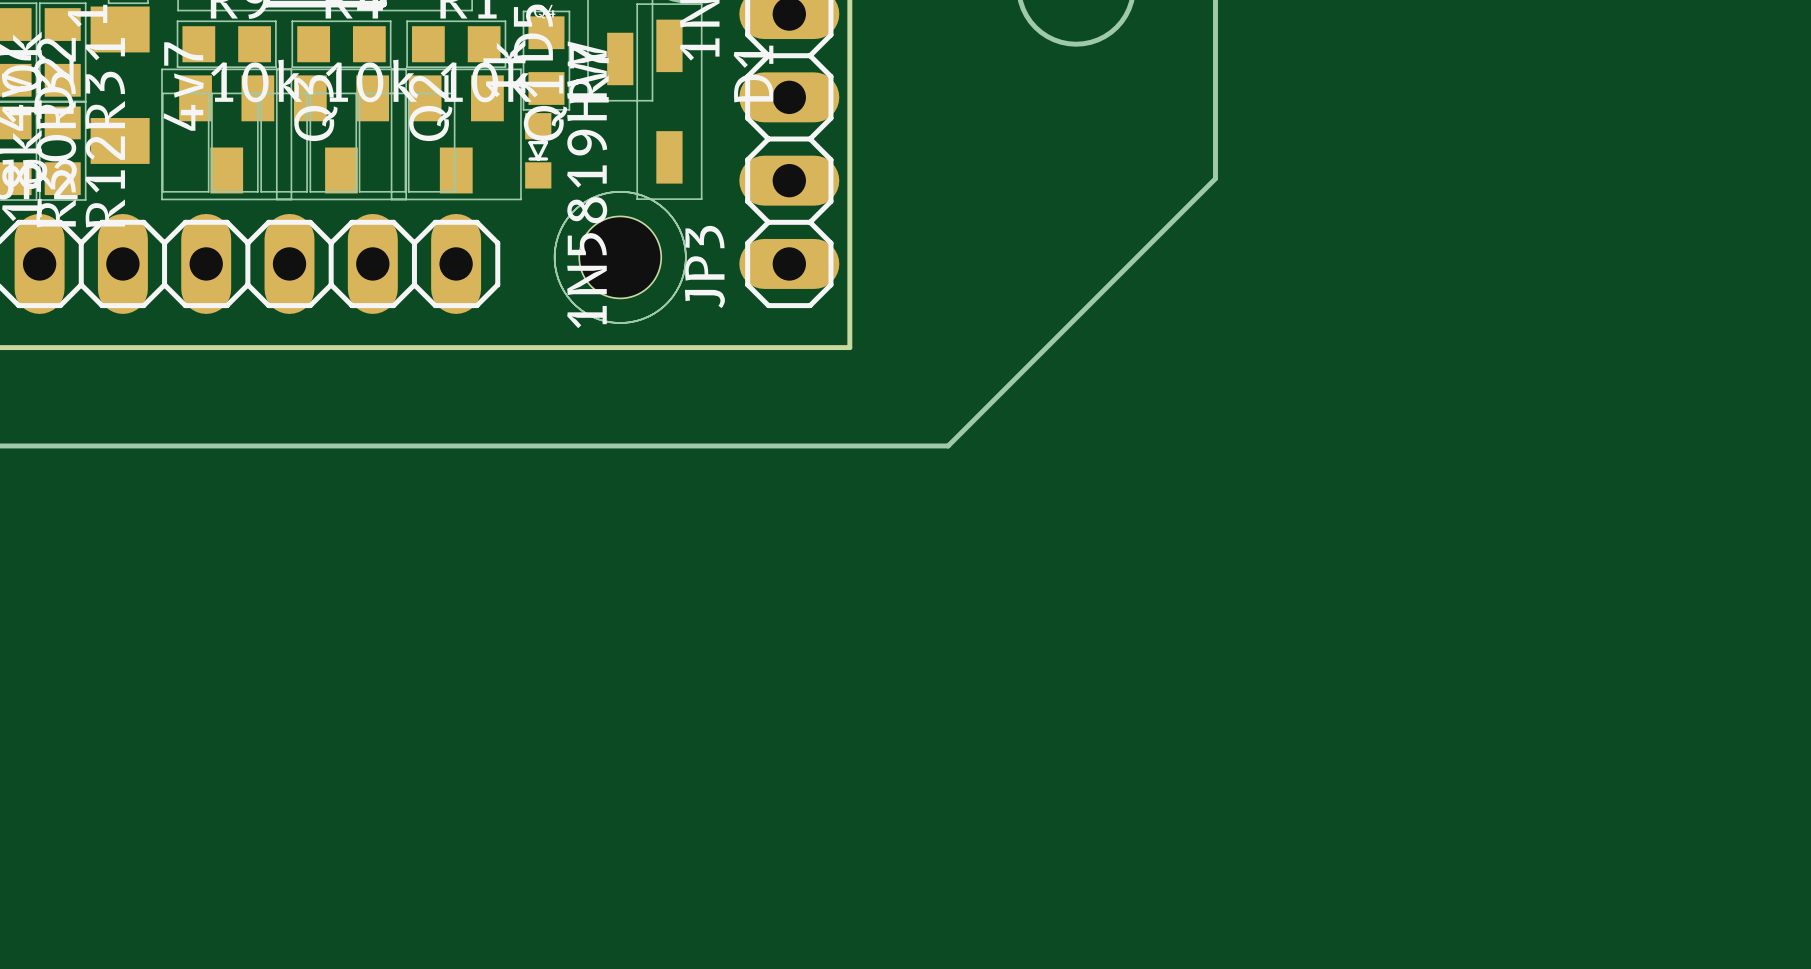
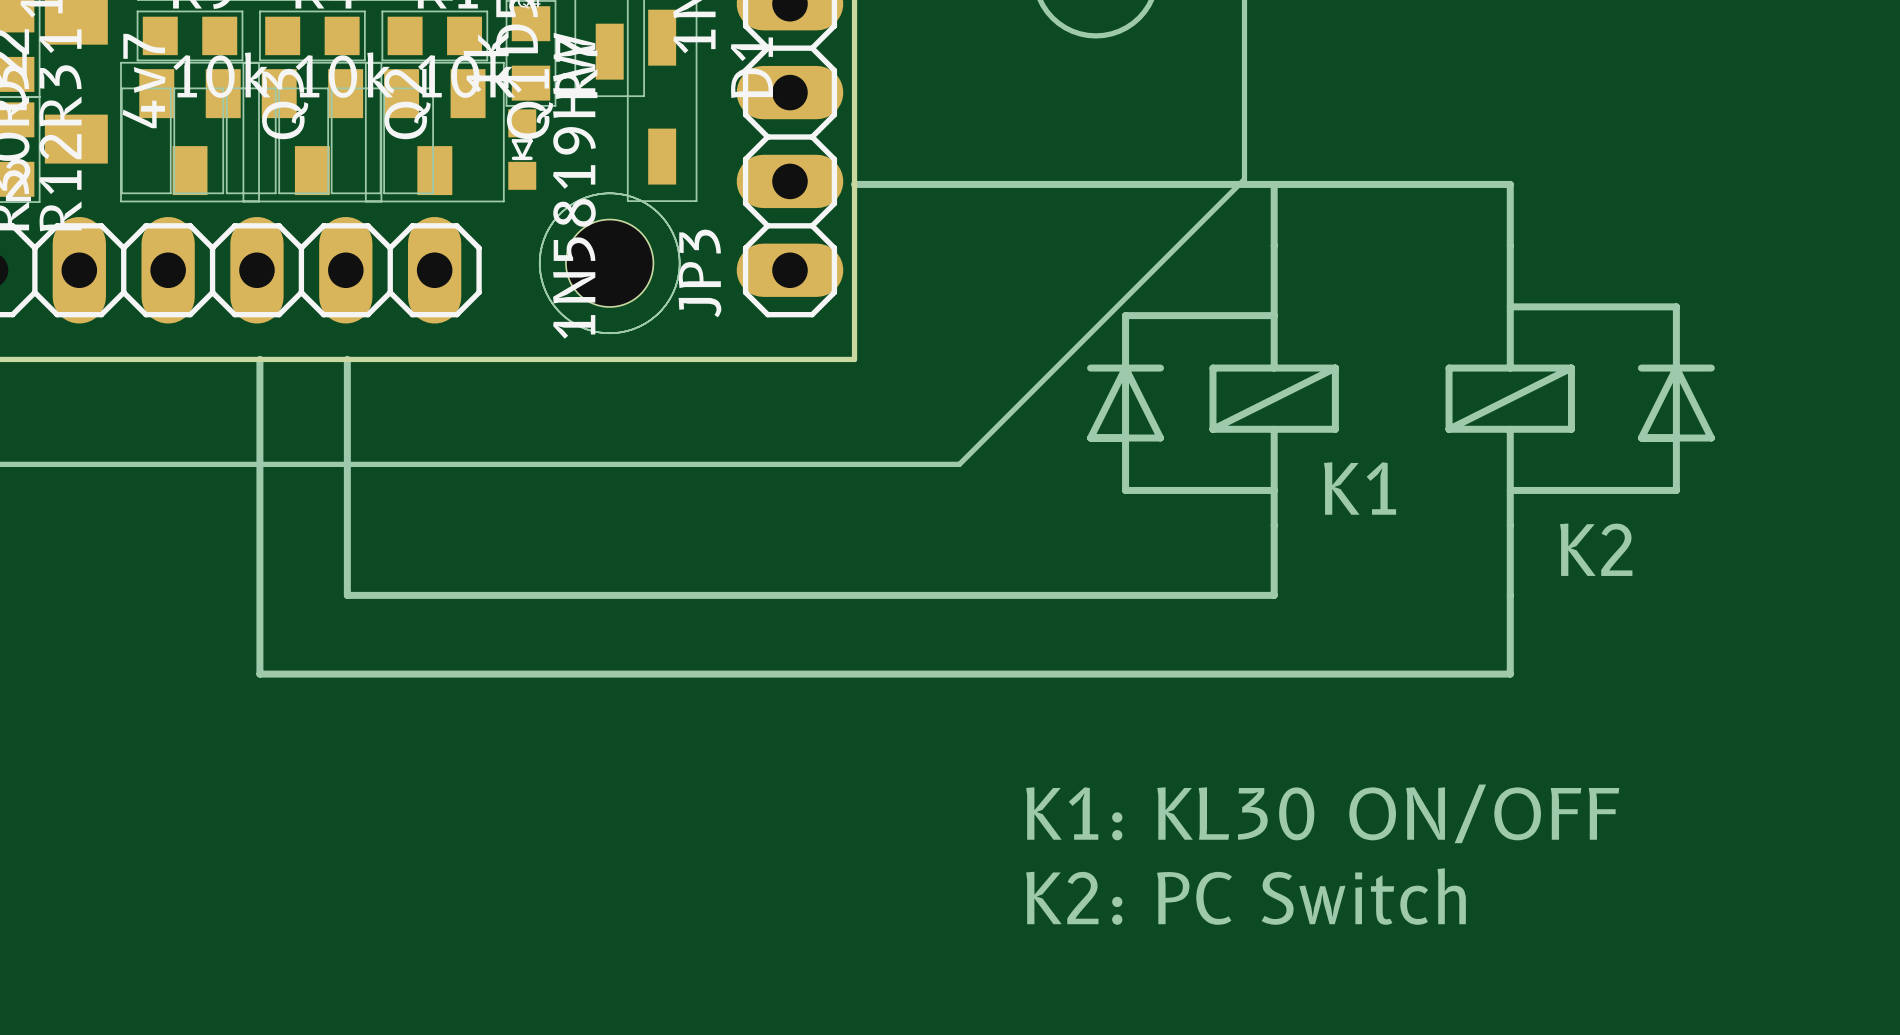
line: none -> (854, 184) (1510, 184) (1510, 368)
line: none -> (1274, 184) (1274, 368)
line: none -> (1510, 306) (1676, 306) (1676, 490) (1510, 490)
line: none -> (1274, 315) (1125, 315) (1125, 490) (1274, 490)
line: none -> (259, 359) (259, 674) (1510, 674) (1510, 429)
line: none -> (347, 359) (347, 595) (1274, 595) (1274, 429)
line: none -> (1090, 368) (1160, 368)
line: none -> (1125, 368) (1160, 438) (1090, 438) (1125, 368)
line: none -> (1335, 368) (1212, 368) (1212, 429)
line: none -> (1335, 368) (1212, 429)
line: none -> (1335, 368) (1335, 429) (1212, 429)
line: none -> (1571, 368) (1449, 368) (1449, 429)
line: none -> (1571, 368) (1571, 429) (1449, 429)
line: none -> (1571, 368) (1449, 429)
line: none -> (1641, 368) (1711, 368)
line: none -> (1676, 368) (1711, 438) (1641, 438) (1676, 368)
text: none -> K1 (1360, 488)
text: none -> K2 (1596, 549)
text: none -> K1: KL30 ON/OFF (1322, 813)
text: none -> K2: PC Switch (1245, 896)

